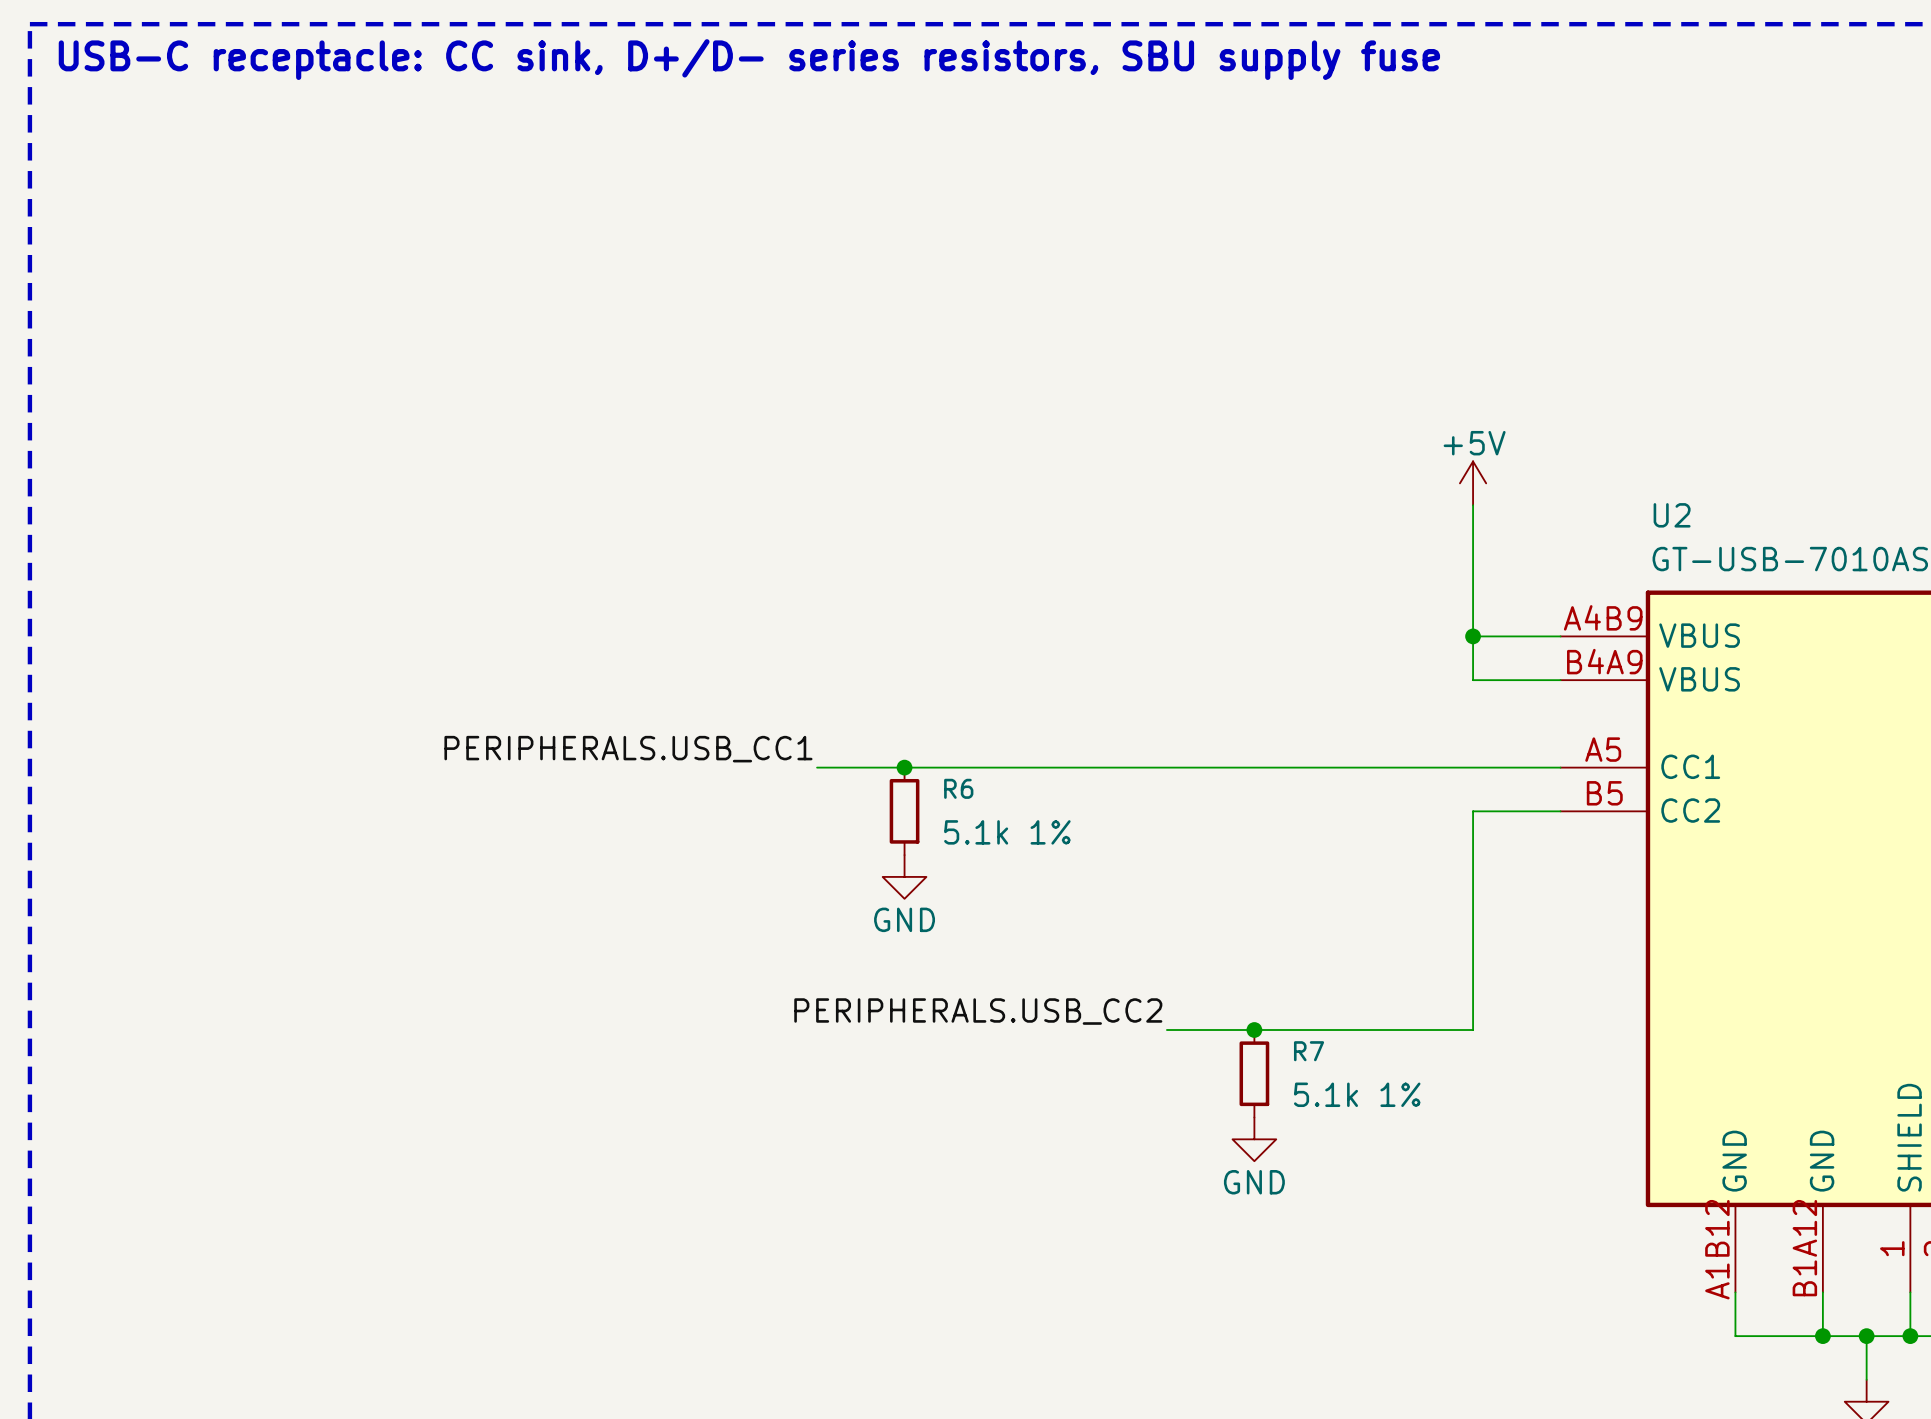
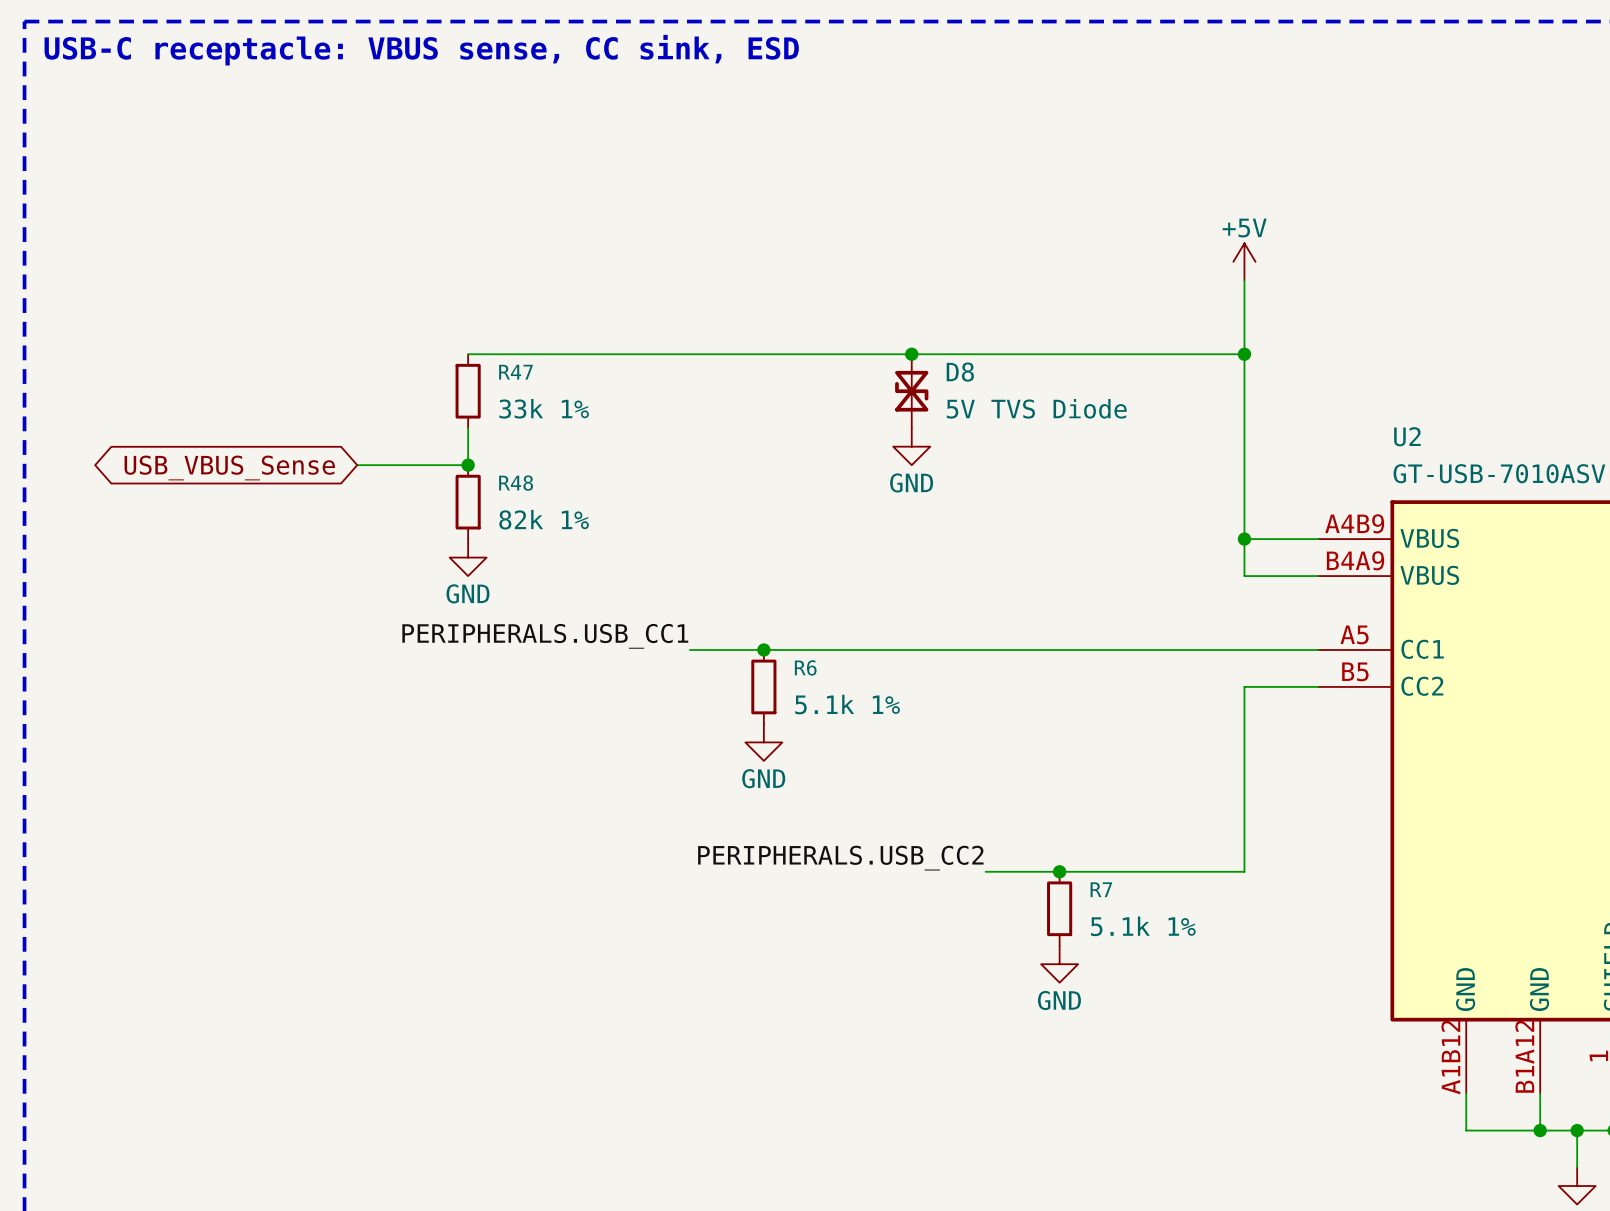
text: USB-C receptacle: CC sink, D+/D- series resistors, SBU supply fuse (749, 59) -> USB-C receptacle: VBUS sense, CC sink, ESD (421, 50)
wire: none -> (1244, 280) (1244, 428)
wire: none -> (468, 354) (1244, 354)
junction: none -> (911, 354)
junction: none -> (1244, 354)
R47: none -> 33k 1% (468, 391)
D8: none -> 5V TVS Diode (911, 391)
power symbol position: +5V (1473, 483) -> +5V (1244, 261)
wire: none -> (468, 428) (468, 465) (357, 465)
power symbol: none -> GND (911, 446)
junction: none -> (468, 465)
global label: none -> USB_VBUS_Sense (229, 467)
R48: none -> 82k 1% (468, 502)
power symbol: none -> GND (468, 557)

